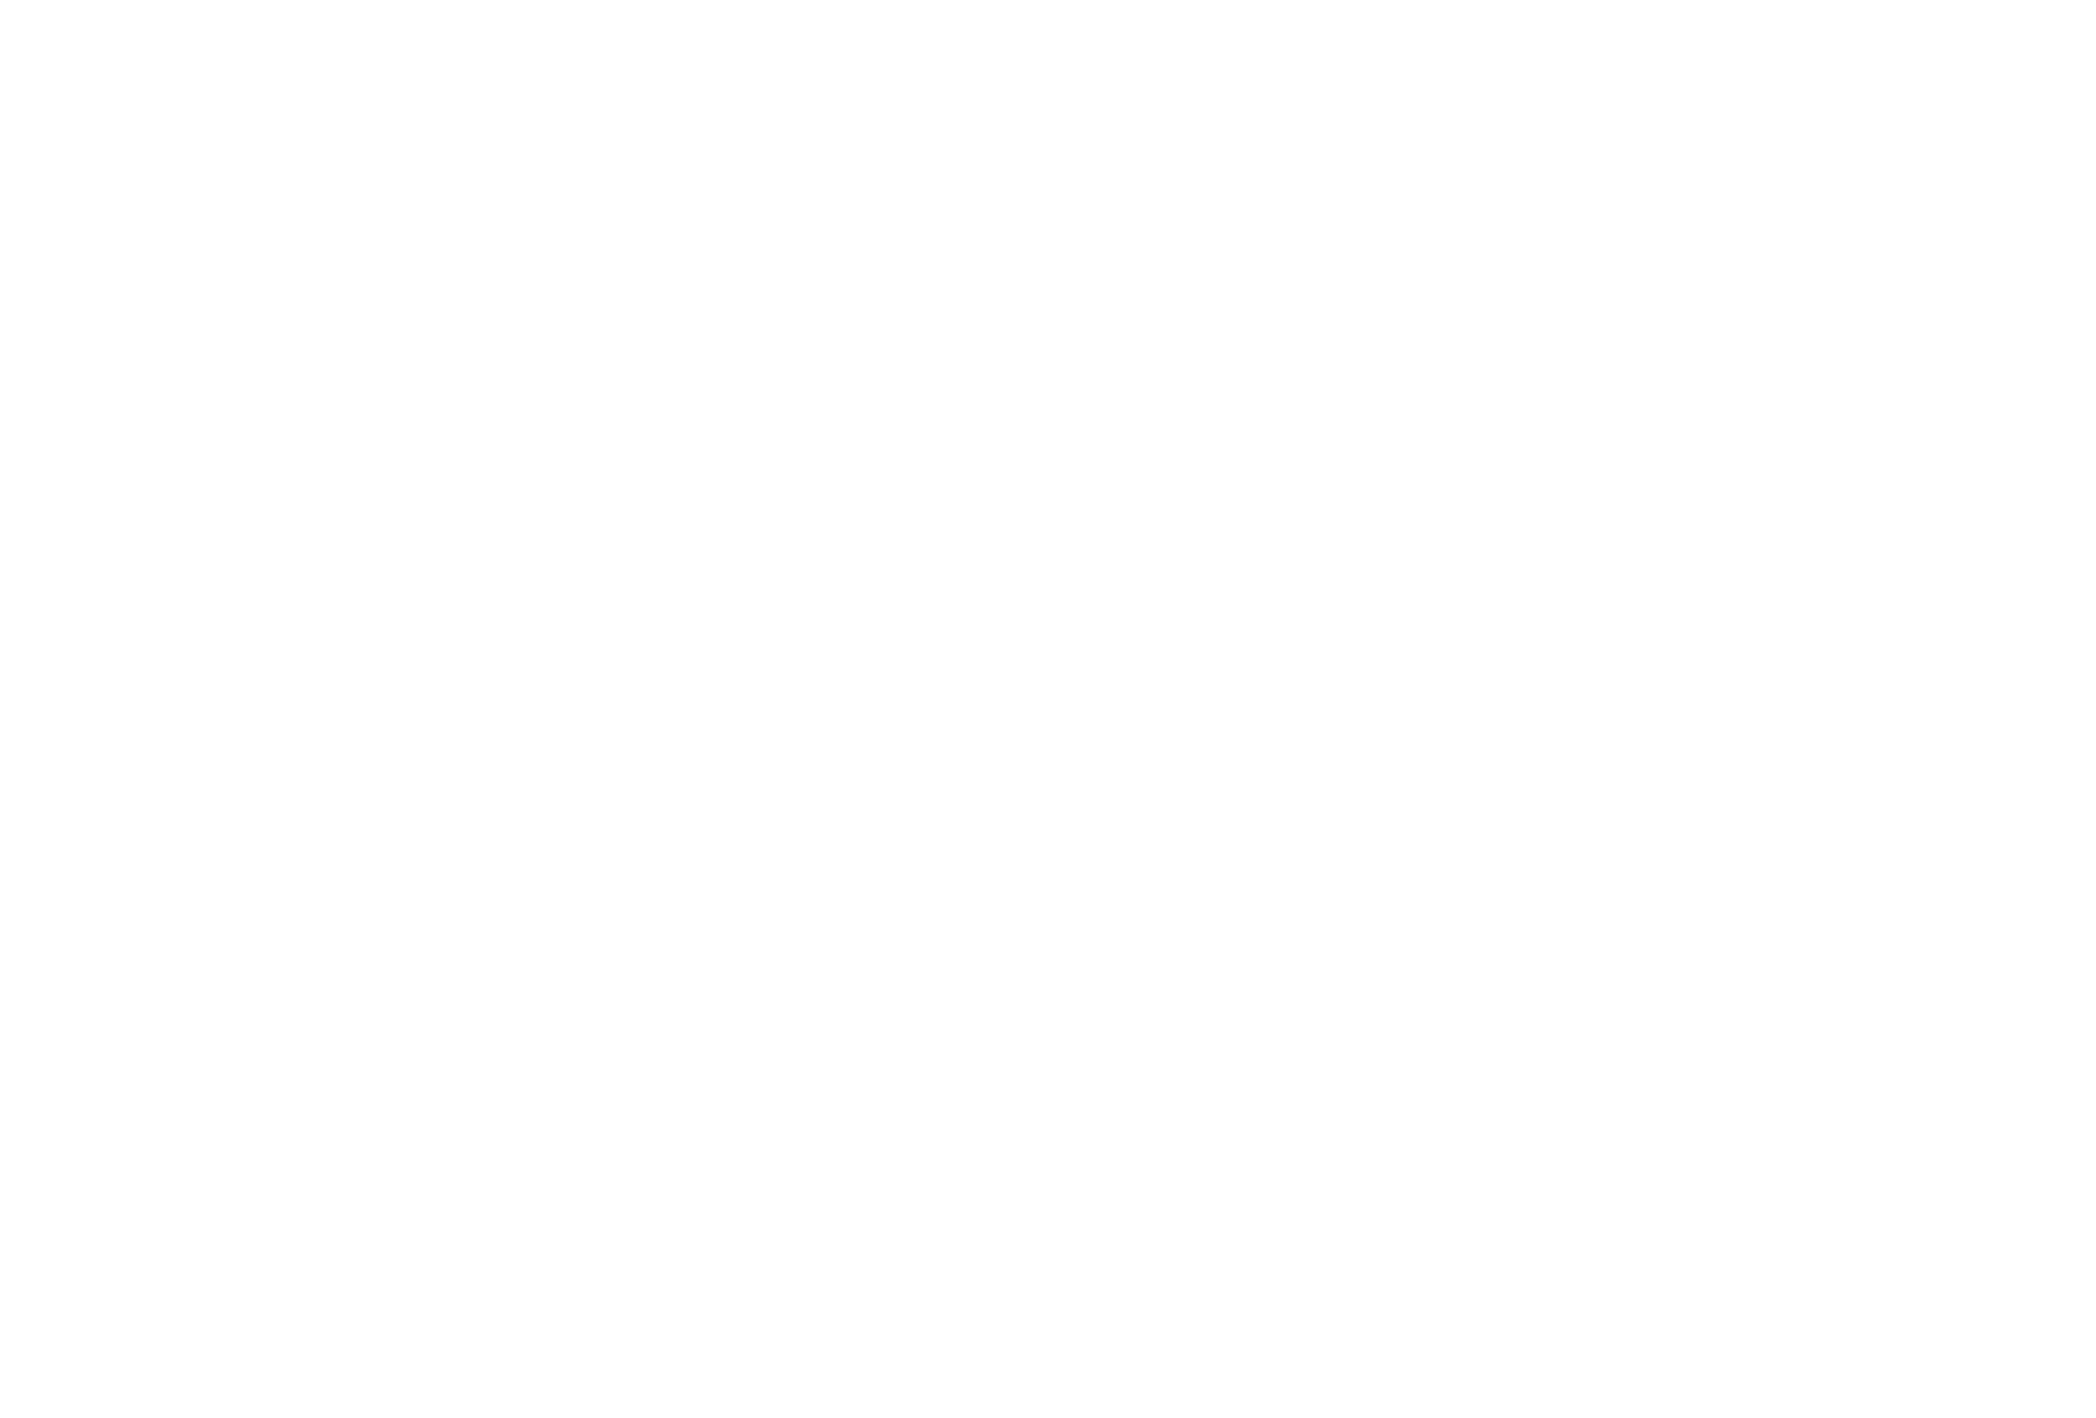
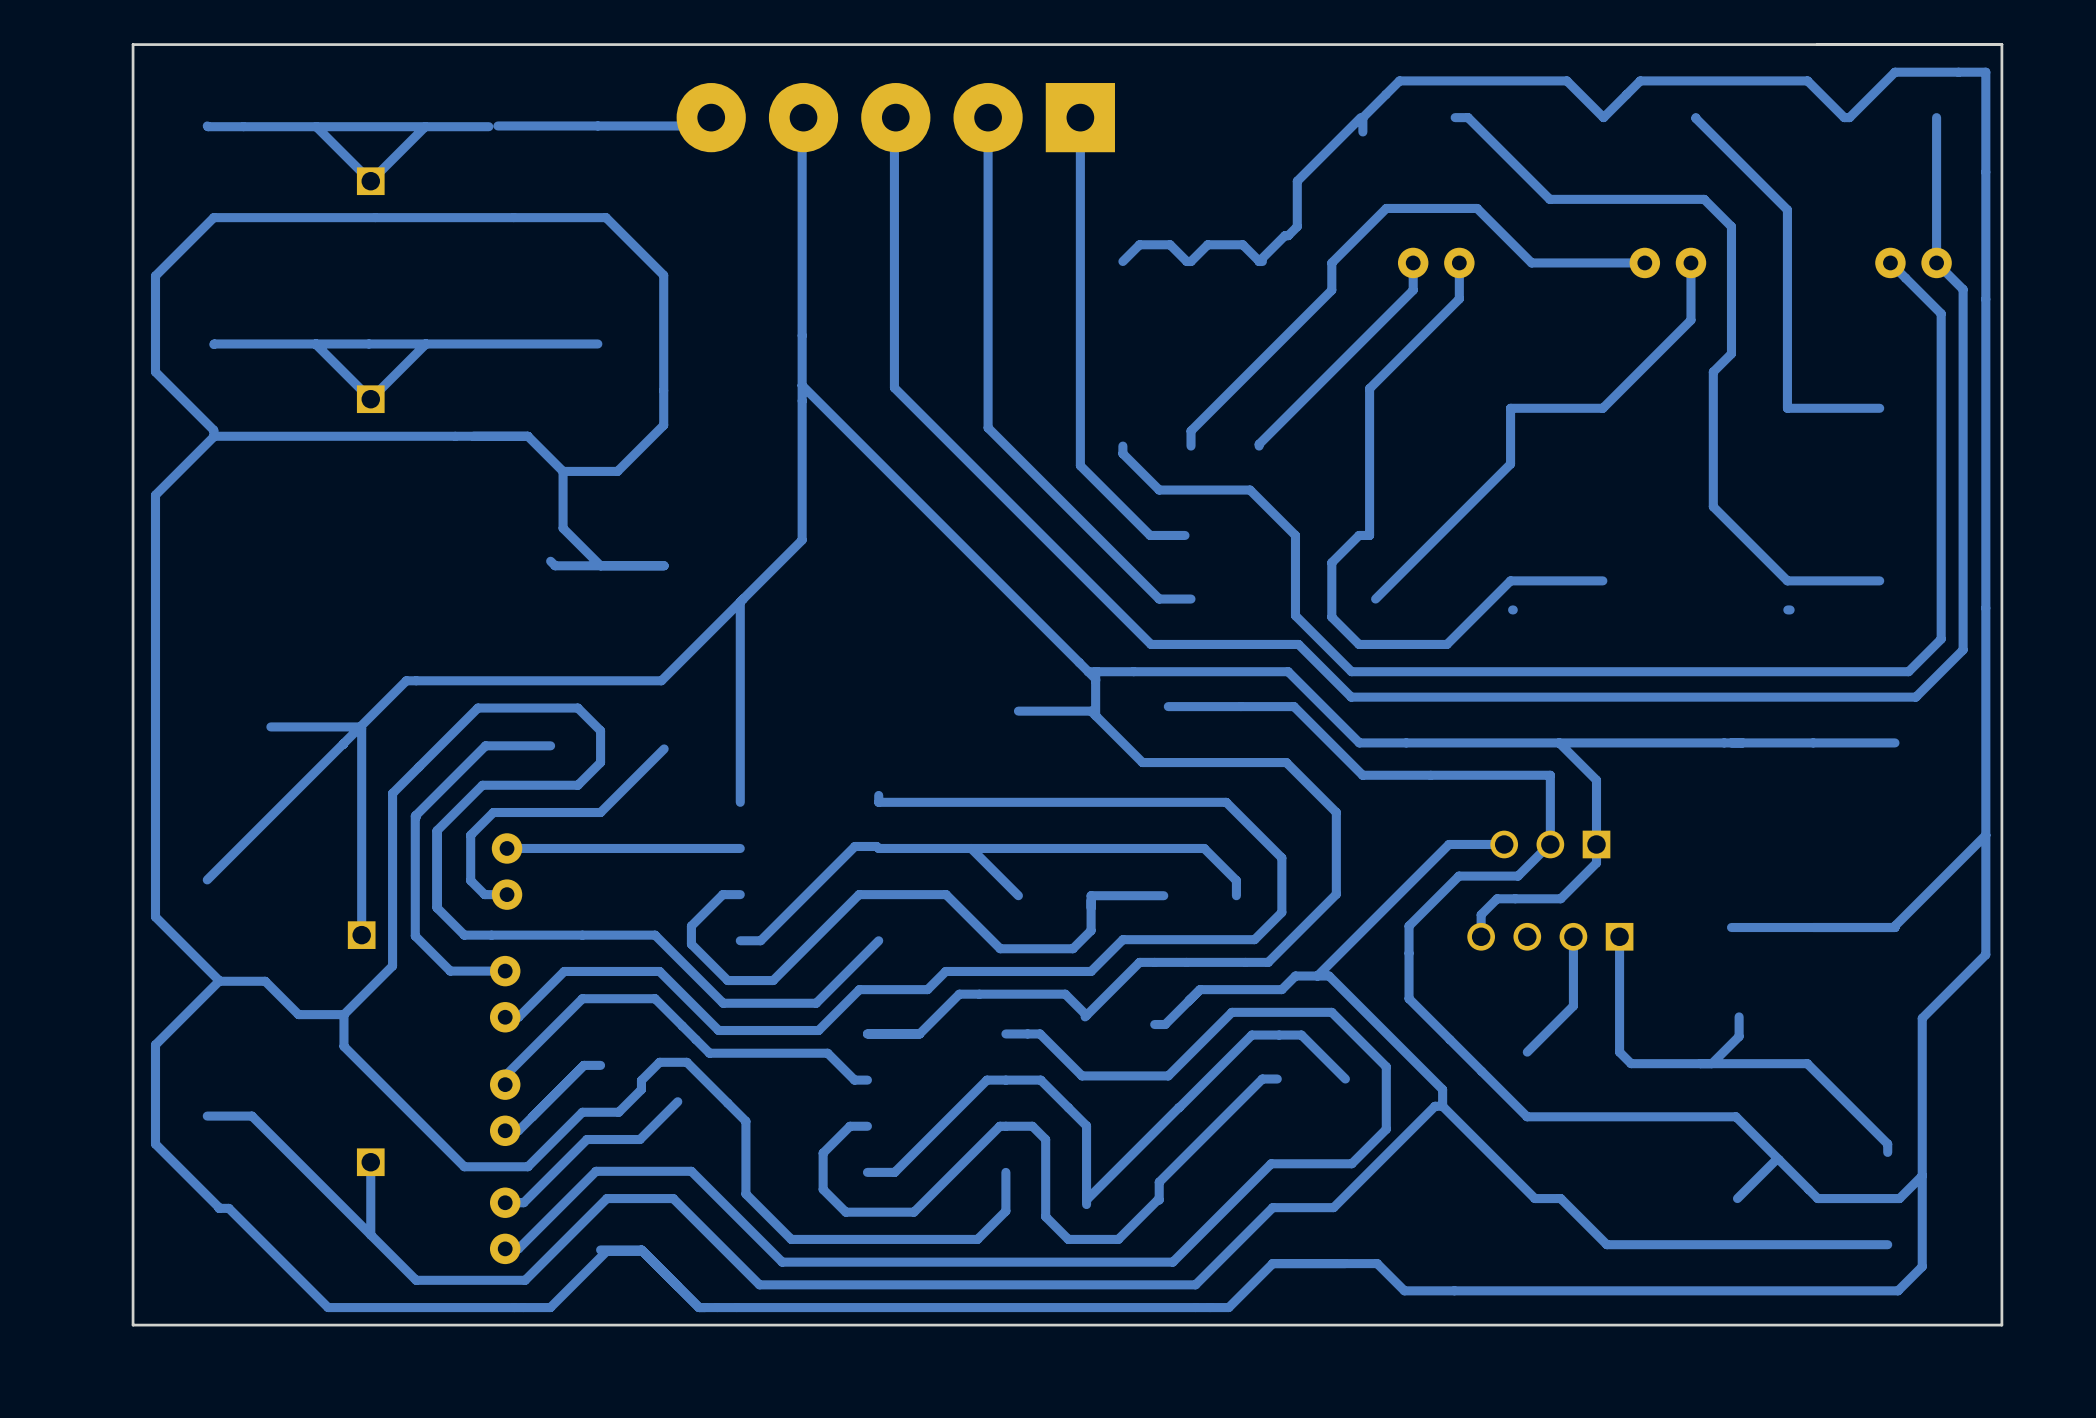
board edge: none -> (2001, 44) (133, 44) (133, 1325) (2001, 1325) (2001, 44)
bottom track: none -> (802, 102) (802, 540) (661, 680) (406, 680) (207, 879)
bottom track: none -> (894, 102) (894, 387) (1151, 644) (1298, 644) (1351, 697) (1915, 697) (1963, 649) (1963, 289) (1936, 262) (1936, 117)
bottom track: none -> (711, 117) (702, 125) (497, 125)
part: none -> (895, 117)
bottom track: none -> (988, 117) (988, 427) (1159, 599) (1191, 599)
bottom track: none -> (1080, 117) (1080, 465) (1150, 535) (1185, 535)
bottom track: none -> (1360, 117) (1297, 181) (1297, 226) (1288, 235) (1284, 235) (1259, 261) (1262, 261)
bottom track: none -> (1455, 117) (1468, 117) (1549, 199) (1704, 199) (1731, 226) (1731, 353) (1713, 371) (1713, 506) (1787, 580) (1879, 580)
bottom track: none -> (1695, 117) (1787, 209) (1787, 408) (1879, 408)
bottom track: none -> (207, 125) (488, 126)
bottom track: none -> (425, 126) (370, 181) (316, 126)
bottom track: none -> (1362, 131) (1362, 117) (1399, 80) (1566, 80) (1603, 117) (1640, 80) (1807, 80) (1844, 117) (1849, 117) (1894, 72) (1985, 72) (1985, 954) (1922, 1018) (1922, 1266) (1898, 1290) (1404, 1290) (1377, 1263) (1272, 1263) (1228, 1307) (699, 1307) (641, 1249) (600, 1249)
part: none -> (370, 181)
bottom track: none -> (1259, 261) (1242, 244) (1207, 244) (1191, 261) (1186, 261) (1170, 244) (1139, 244) (1122, 261)
bottom track: none -> (1413, 262) (1413, 290) (1259, 446)
part: none -> (1436, 262)
bottom track: none -> (1459, 262) (1459, 298) (1369, 388) (1369, 535) (1359, 535) (1331, 562) (1331, 617) (1359, 644) (1446, 644) (1510, 580) (1602, 580)
bottom track: none -> (1644, 262) (1531, 262) (1477, 208) (1386, 208) (1331, 262) (1331, 290) (1191, 431) (1191, 446)
part: none -> (1667, 262)
bottom track: none -> (1690, 262) (1690, 320) (1602, 408) (1510, 408) (1510, 464) (1375, 599)
bottom track: none -> (1890, 262) (1941, 313) (1941, 639) (1908, 671) (1351, 671) (1295, 615) (1295, 535) (1250, 490) (1159, 490) (1122, 453) (1122, 446)
part: none -> (1913, 262)
bottom track: none -> (315, 343) (371, 399)
bottom track: none -> (597, 343) (426, 343) (370, 399)
bottom track: none -> (213, 344) (425, 344)
bottom track: none -> (802, 385) (1095, 678)
part: none -> (370, 399)
bottom track: none -> (213, 436) (213, 430) (155, 371) (155, 275) (213, 217) (606, 217) (663, 275) (663, 425) (617, 471) (563, 471)
bottom track: none -> (563, 471) (563, 528) (600, 565)
bottom track: none -> (563, 471) (527, 436) (214, 436) (155, 495) (155, 916) (219, 981)
bottom track: none -> (550, 561) (555, 565) (664, 565)
bottom track: none -> (740, 601) (740, 802)
bottom track: none -> (1513, 609) (1512, 609)
bottom track: none -> (1790, 609) (1787, 609)
bottom track: none -> (1088, 671) (1288, 671) (1359, 742) (1894, 742)
bottom track: none -> (1095, 671) (1095, 715)
bottom track: none -> (1168, 706) (1294, 706) (1362, 775) (1550, 775) (1550, 844) (1518, 876) (1458, 876) (1409, 926) (1409, 998) (1527, 1116) (1736, 1116) (1817, 1198) (1899, 1198) (1922, 1175)
bottom track: none -> (1018, 711) (1091, 711) (1142, 762) (1286, 762) (1336, 812) (1336, 894) (1268, 962) (1139, 962) (1085, 1016)
bottom track: none -> (270, 726) (361, 728) (361, 935)
bottom track: none -> (1559, 742) (1596, 780) (1596, 863) (1560, 898) (1497, 898) (1481, 914) (1481, 936)
bottom track: none -> (550, 745) (485, 745) (415, 816) (415, 936) (450, 971) (505, 971)
bottom track: none -> (664, 748) (600, 812) (493, 812) (470, 835) (470, 880) (484, 894) (507, 894)
bottom track: none -> (878, 795) (878, 802) (1226, 802) (1281, 857) (1281, 912) (1254, 939) (1122, 939) (1091, 971) (945, 971) (927, 989) (859, 989) (818, 1030) (718, 1030) (659, 971) (564, 971) (518, 1017) (504, 1016)
bottom track: none -> (1985, 835) (1894, 927) (1731, 927)
bottom track: none -> (1504, 844) (1448, 844) (1317, 976)
part: none -> (1550, 844)
bottom track: none -> (740, 848) (507, 848)
bottom track: none -> (971, 848) (1018, 895)
part: none -> (507, 871)
bottom track: none -> (740, 894) (722, 894) (691, 926) (691, 944) (727, 980) (773, 980) (859, 894) (946, 894) (1000, 948) (1072, 948) (1091, 930) (1091, 895) (1163, 895)
bottom track: none -> (1236, 895) (1236, 880) (1204, 848) (878, 848) (876, 846) (854, 846) (760, 940) (740, 940)
part: none -> (361, 935)
part: none -> (1550, 936)
bottom track: none -> (1573, 936) (1573, 1005) (1527, 1052)
bottom track: none -> (1619, 936) (1619, 1052) (1631, 1063) (1807, 1063) (1887, 1144) (1887, 1152)
bottom track: none -> (878, 940) (816, 1003) (723, 1003) (655, 935) (464, 935) (437, 907) (437, 830) (482, 785) (577, 785) (600, 762) (600, 730) (577, 708) (477, 708) (392, 793) (392, 966) (343, 1014)
bottom track: none -> (219, 981) (265, 981) (298, 1014) (343, 1014)
bottom track: none -> (219, 981) (155, 1044) (155, 1144) (219, 1208) (228, 1208) (328, 1307) (550, 1307) (606, 1251) (642, 1251)
part: none -> (505, 994)
bottom track: none -> (343, 1014) (343, 1046) (464, 1166) (527, 1166) (582, 1112) (618, 1112) (641, 1089) (641, 1080) (659, 1062) (686, 1062) (745, 1121) (745, 1194) (791, 1239) (977, 1239) (1005, 1211) (1005, 1172)
bottom track: none -> (1086, 1015) (1065, 994) (959, 994) (919, 1033) (867, 1033)
bottom track: none -> (1739, 1016) (1739, 1036) (1711, 1063)
bottom track: none -> (1154, 1024) (1165, 1024) (1200, 989) (1281, 989) (1295, 976) (1329, 976) (1442, 1089) (1442, 1106)
bottom track: none -> (1005, 1033) (1040, 1033) (1082, 1075) (1168, 1075) (1231, 1012) (1331, 1012) (1386, 1066) (1386, 1129) (1351, 1163) (1271, 1163) (1172, 1262) (782, 1262) (691, 1171) (596, 1171) (518, 1248) (505, 1248)
bottom track: none -> (600, 1065) (583, 1065) (518, 1130) (505, 1130)
bottom track: none -> (1277, 1079) (1262, 1079) (1159, 1182) (1159, 1200) (1118, 1239) (1068, 1239) (1045, 1216) (1045, 1139) (1032, 1126) (999, 1126) (913, 1212) (845, 1212) (823, 1189) (823, 1153) (850, 1126) (867, 1126)
bottom track: none -> (1345, 1079) (1301, 1035) (1251, 1035) (1179, 1107)
bottom track: none -> (867, 1080) (854, 1080) (827, 1053) (709, 1053) (655, 998) (582, 998) (505, 1075) (505, 1084)
bottom track: none -> (677, 1101) (640, 1139) (586, 1139) (523, 1202) (505, 1202)
bottom track: none -> (1442, 1106) (1534, 1198) (1560, 1198) (1606, 1244) (1887, 1244)
bottom track: none -> (1442, 1106) (1435, 1106) (1333, 1207) (1272, 1207) (1195, 1284) (759, 1284) (673, 1198) (606, 1198) (525, 1280) (416, 1280) (251, 1116) (207, 1116)
part: none -> (505, 1107)
bottom track: none -> (1178, 1107) (1086, 1200)
bottom track: none -> (1779, 1159) (1776, 1159) (1737, 1198)
bottom track: none -> (370, 1162) (370, 1234)
part: none -> (370, 1162)
bottom track: none -> (867, 1172) (894, 1172) (987, 1080) (1040, 1080) (1086, 1125) (1086, 1204)
part: none -> (505, 1225)

